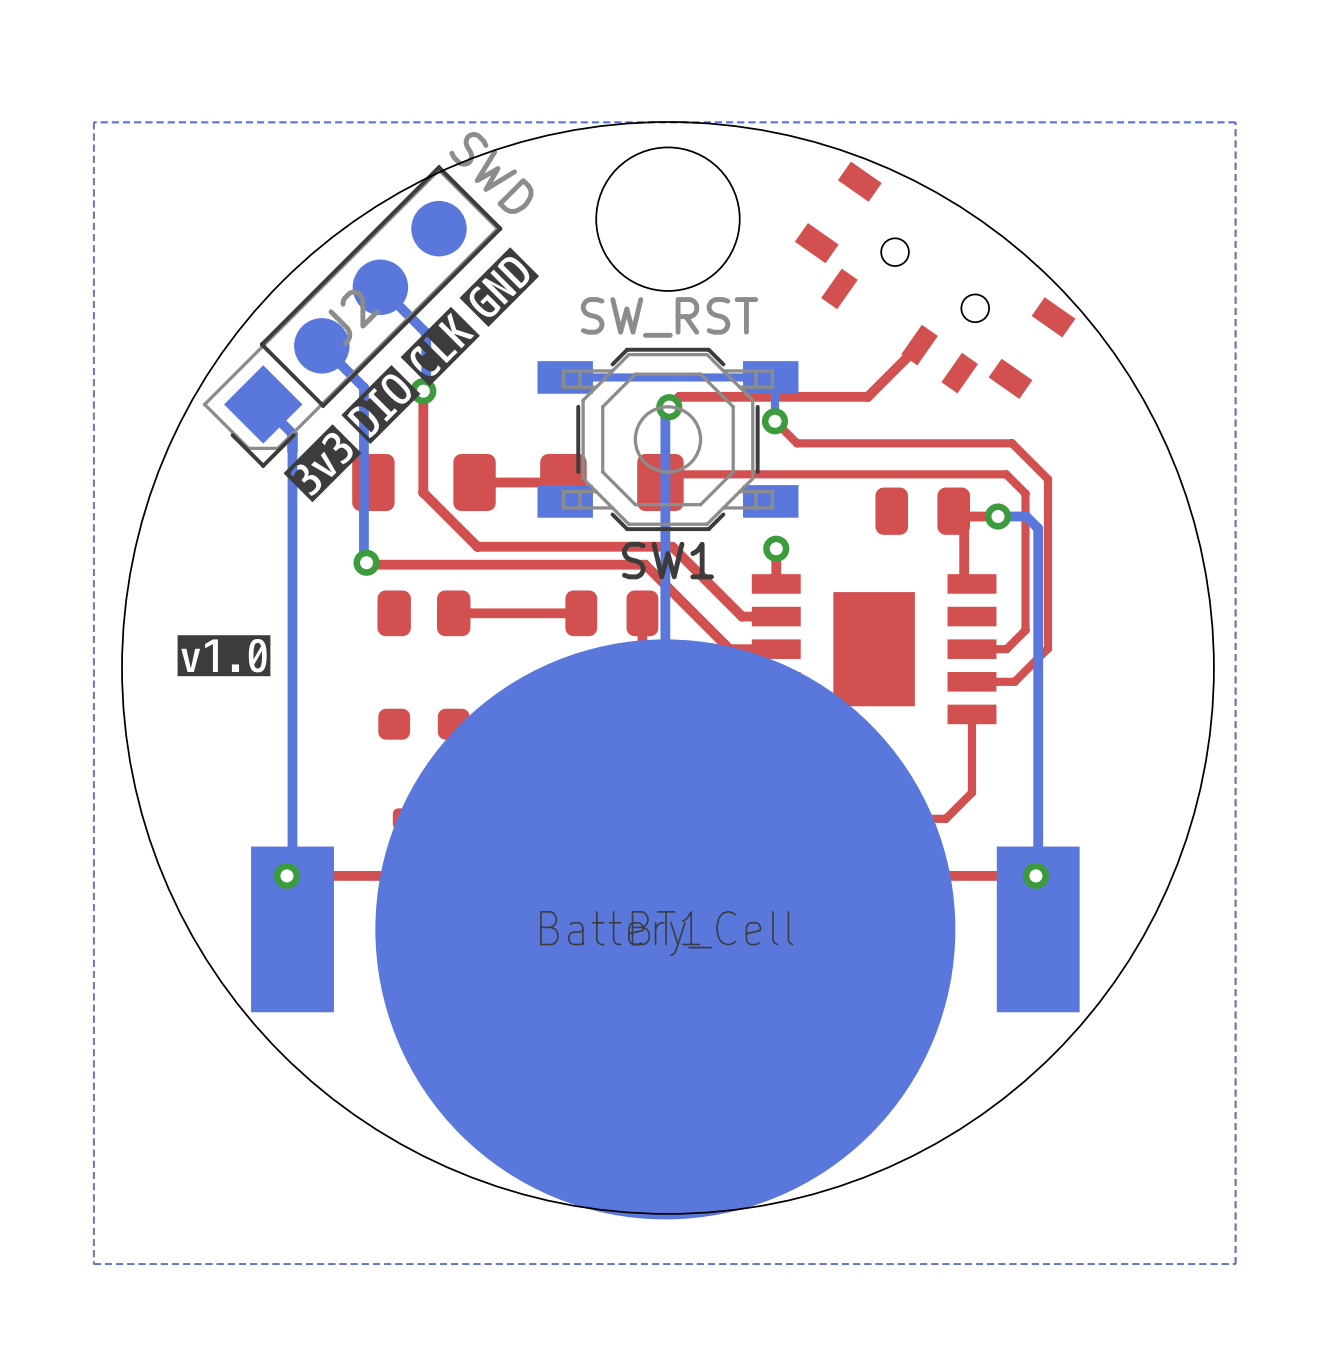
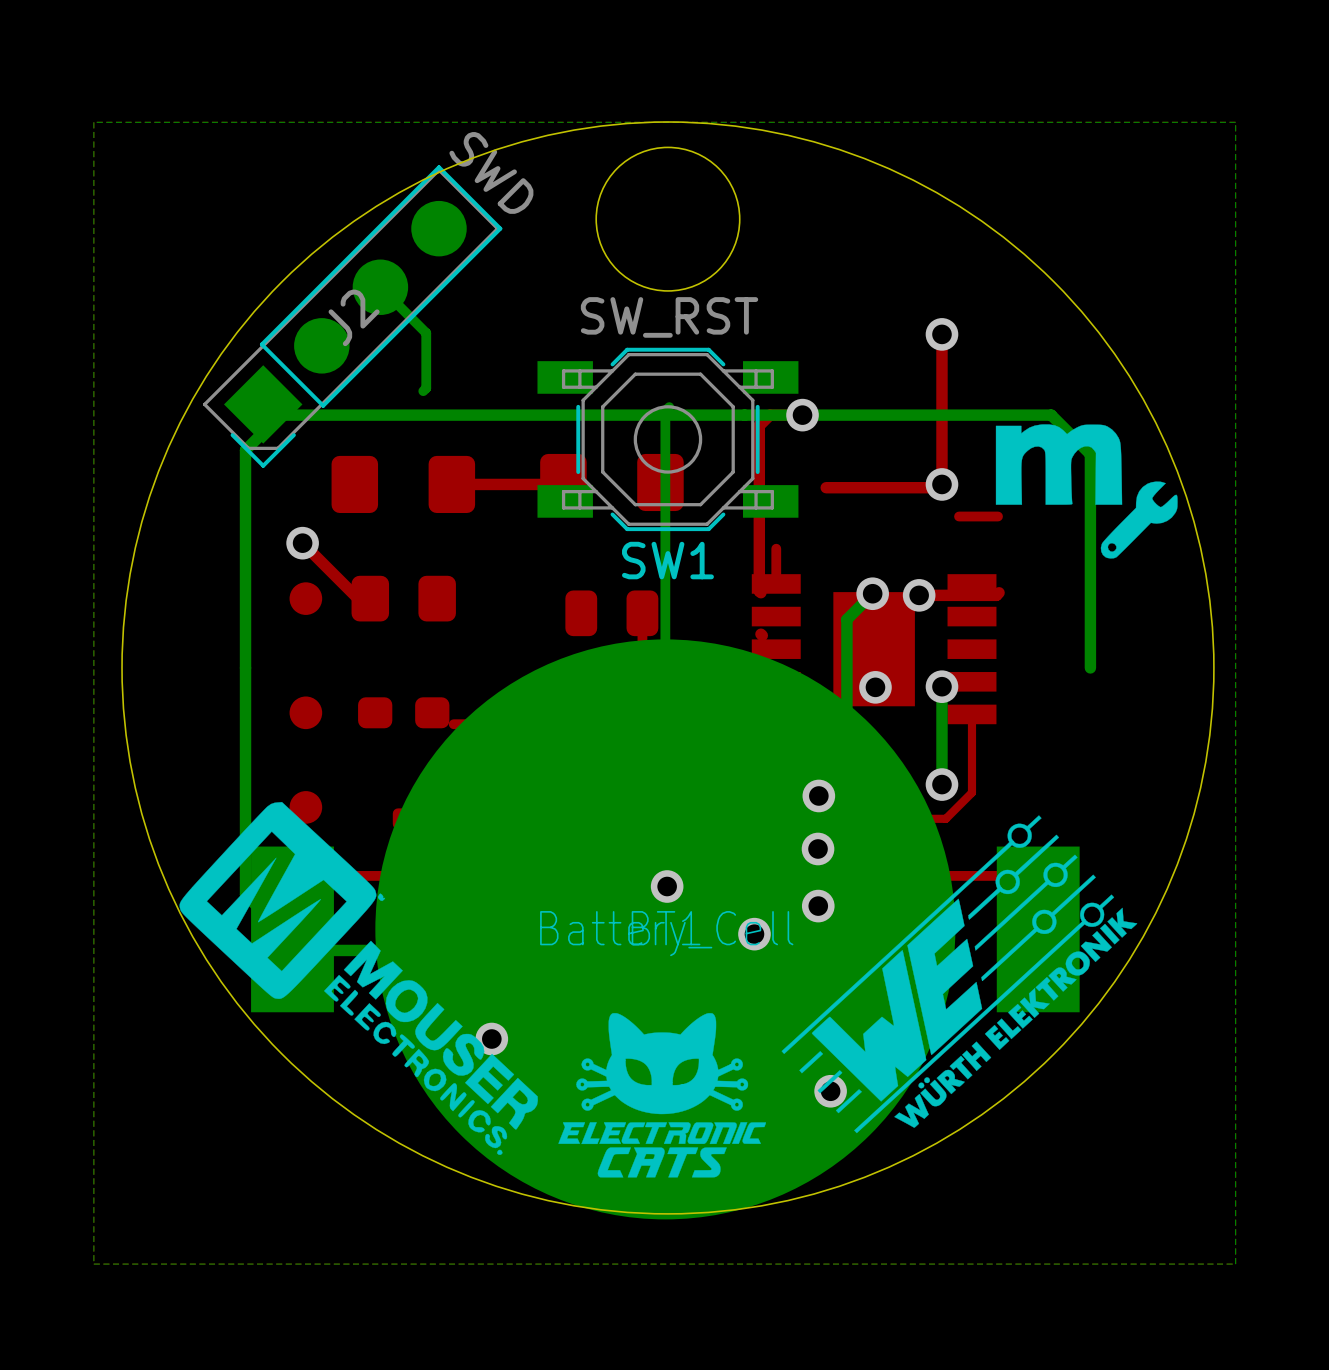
drawing: [283, 247, 540, 503] -> none
part: (935, 280) -> none
top track: none -> (941, 334) (941, 484) (938, 487) (826, 487)
via: none -> (941, 334)
bottom track: (322, 345) (363, 387) (363, 560) (366, 562) -> none
top track: (919, 345) (867, 396) (679, 396) (669, 407) -> none
bottom track: (565, 377) (770, 377) (774, 381) (774, 421) -> none
top track: (423, 391) (423, 492) (477, 546) (672, 546) (742, 616) (776, 616) -> none
via: (423, 391) -> none
bottom track: (263, 404) (292, 433) (292, 929) -> none
via: (669, 407) -> none
top track: none -> (802, 415) (769, 415) (759, 425) (759, 591) (760, 592)
top track: (774, 421) (797, 443) (1012, 443) (1048, 479) (1048, 648) (1014, 681) (971, 681) -> none
via position: (774, 421) -> (802, 415)
drawing: none -> [995, 424, 1178, 559]
part footprint: [352, 453, 496, 512] -> [331, 455, 476, 513]
top track: (563, 482) (474, 482) -> none
top track: (660, 482) (668, 474) (1006, 474) (1025, 493) (1025, 630) (1006, 649) (971, 649) -> none
top track: none -> (551, 484) (451, 484)
via: none -> (941, 484)
part: (922, 511) -> none
top track: (953, 511) (964, 521) (964, 576) (971, 583) -> none
bottom track: (998, 516) (1026, 516) (1038, 528) (1038, 929) -> none
via: (998, 516) -> none
top track: none -> (302, 543) (358, 598) (370, 598)
via: none -> (302, 543)
via: (776, 548) -> none
top track: (366, 562) (368, 564) (645, 564) (729, 649) (776, 649) -> none
via: (366, 562) -> none
part footprint: [377, 590, 471, 637] -> [351, 575, 456, 622]
top track: none -> (999, 592) (996, 595) (919, 595)
bottom track: none -> (872, 593) (846, 619) (846, 781)
via: none -> (872, 593)
via: none -> (919, 595)
part: none -> (305, 598)
top track: (581, 613) (453, 613) -> none
top track: none -> (760, 634) (762, 635)
drawing: [177, 635, 271, 677] -> none
bottom track: none -> (1090, 667) (1090, 454) (1051, 415) (280, 415) (245, 450) (245, 894) (301, 950) (738, 950) (754, 934)
bottom track: none -> (941, 686) (941, 784)
via: none -> (941, 686)
via: none -> (875, 687)
part footprint: [378, 708, 470, 740] -> [358, 697, 450, 729]
part: none -> (305, 712)
via: none -> (941, 784)
via: none -> (818, 795)
drawing: none -> [179, 802, 1138, 1178]
part: none -> (305, 807)
via: none -> (818, 848)
via: (286, 875) -> none
via: (1035, 875) -> none
via: none -> (667, 886)
via: none -> (818, 906)
via: none -> (754, 934)
via: none -> (491, 1039)
via: none -> (830, 1091)

